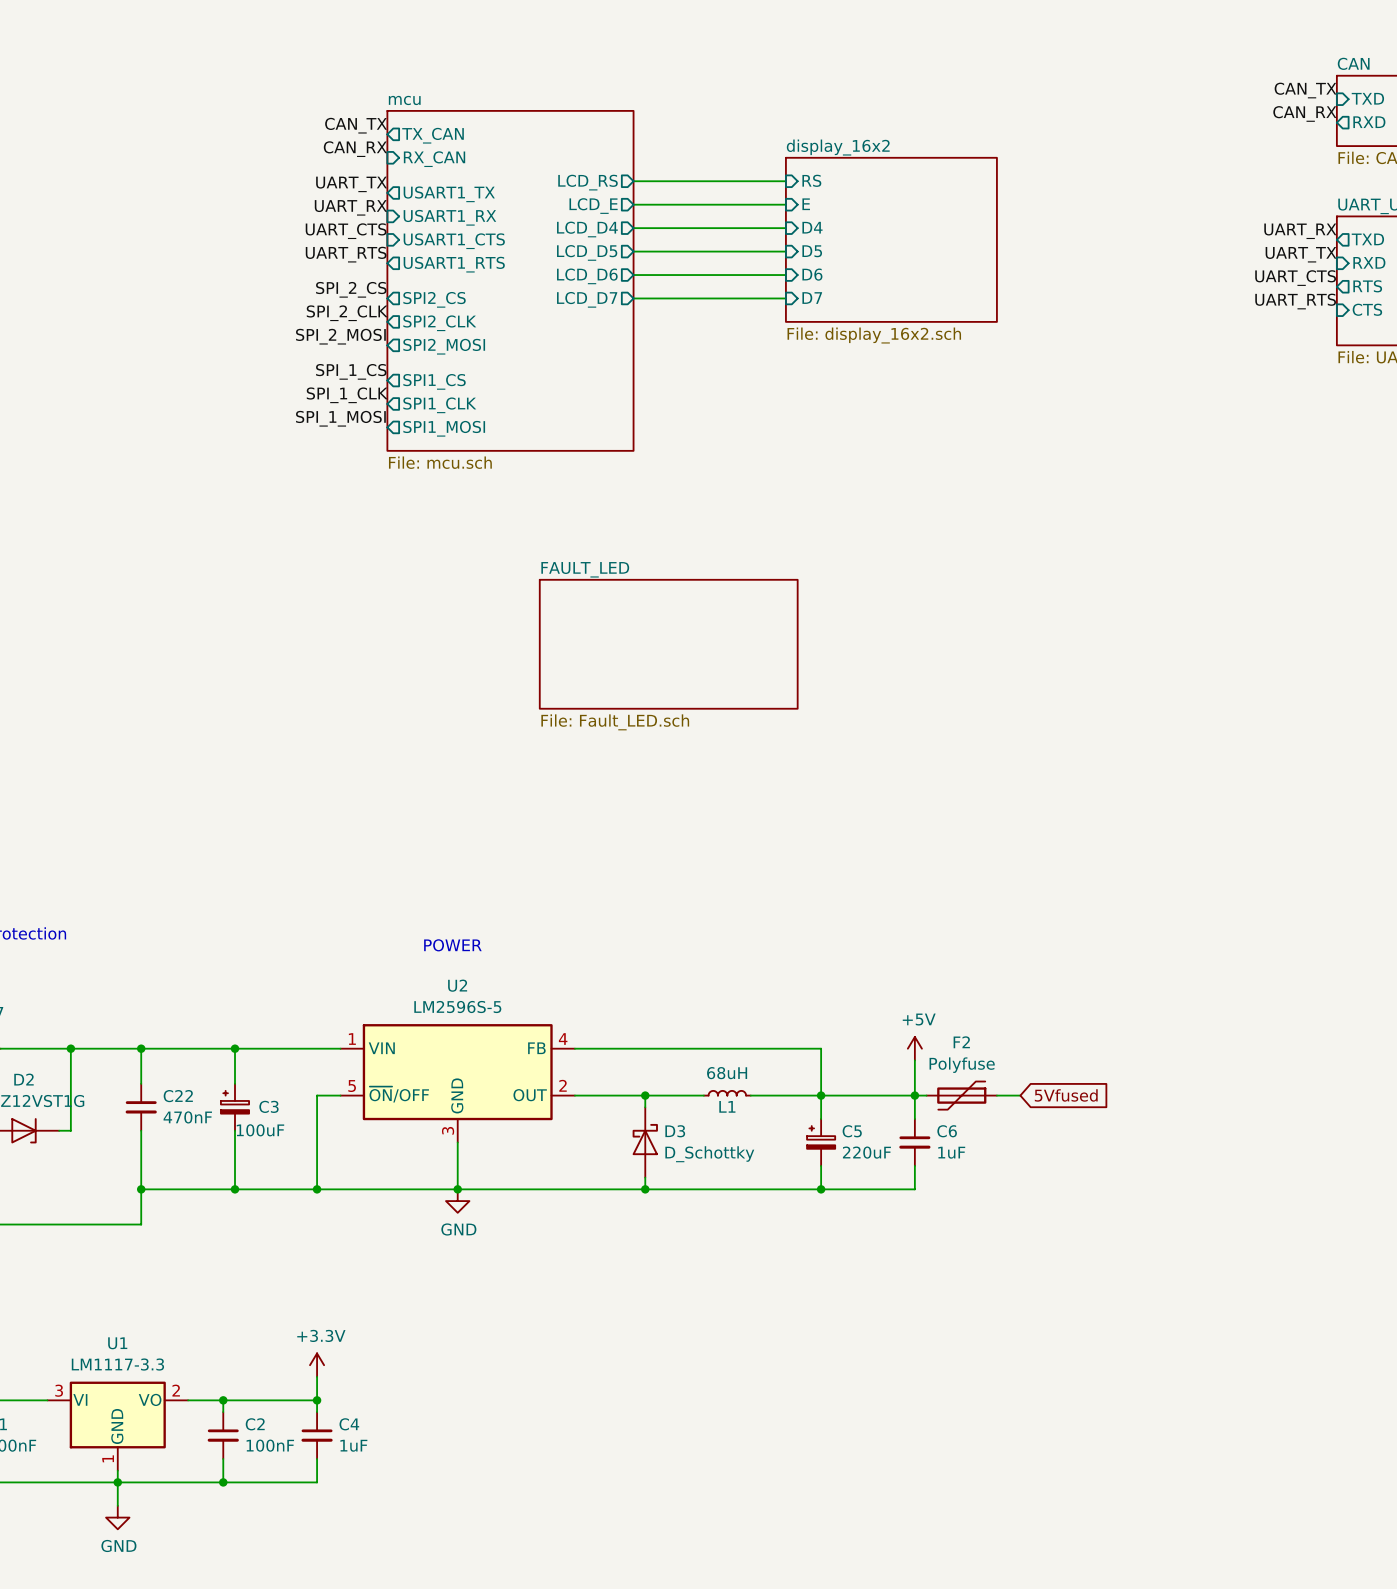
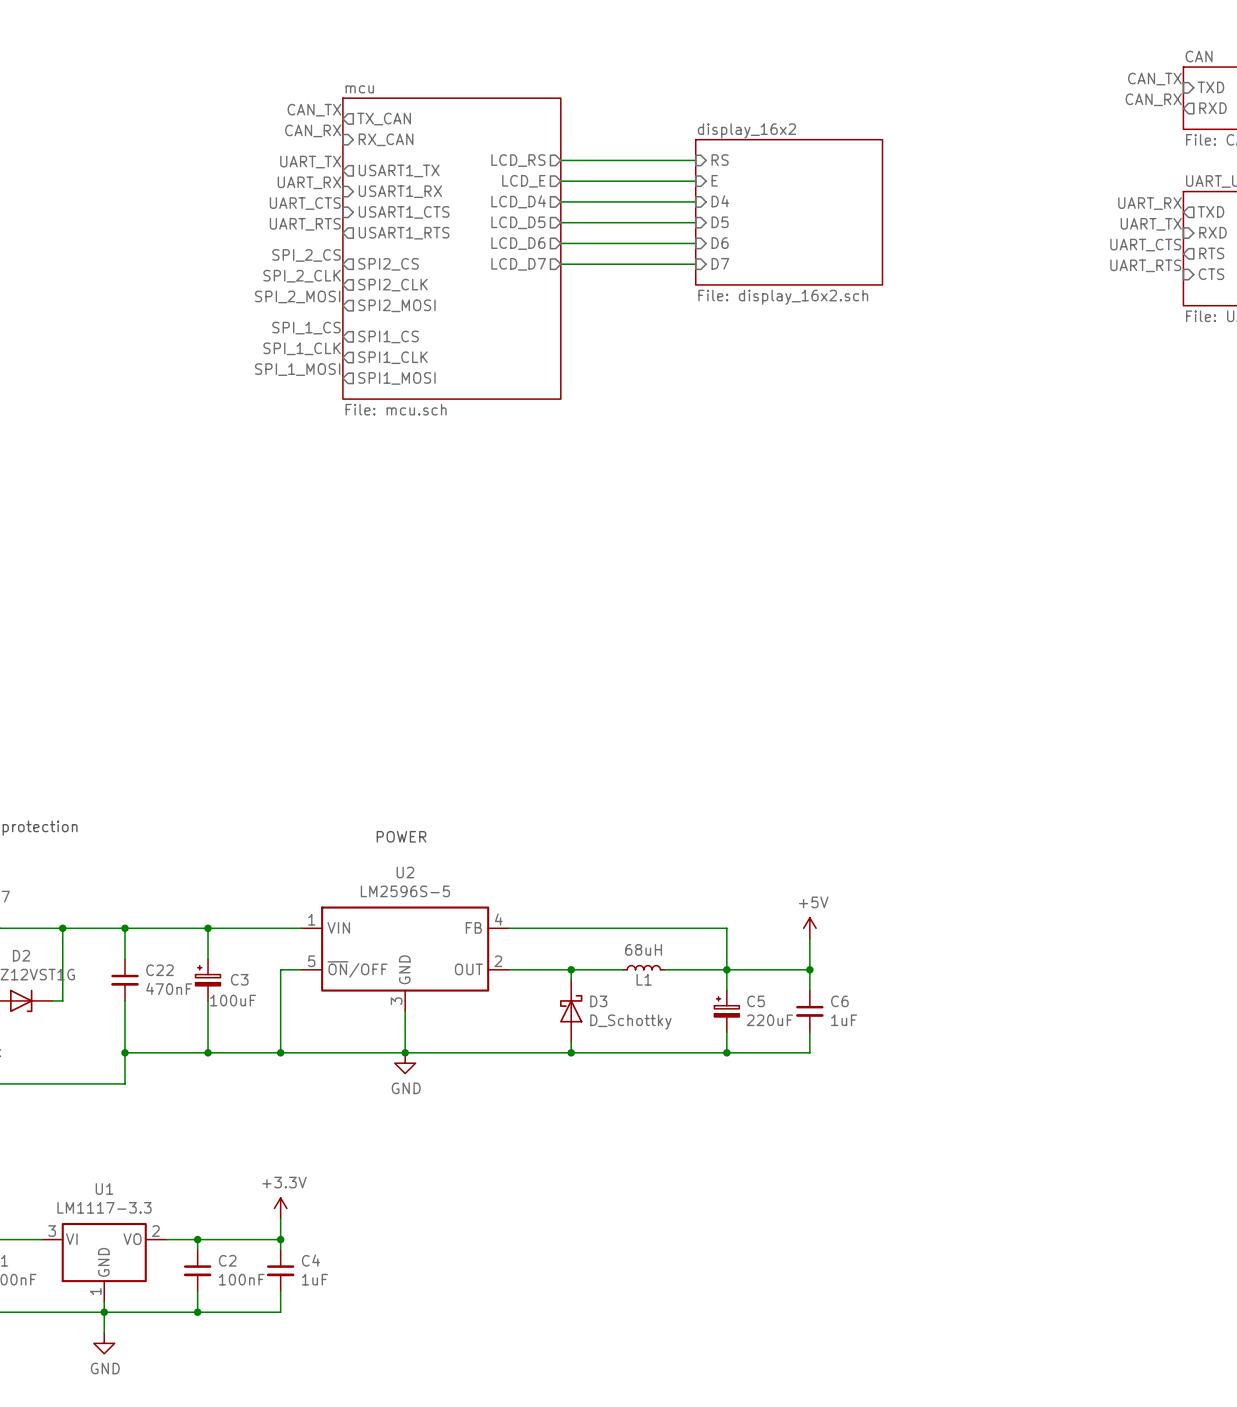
sheet FAULT_LED: File: Fault_LED.sch (668, 644) -> none
wire: (914, 1095) (926, 1095) -> none
F2: Polyfuse (961, 1095) -> none
wire: (996, 1095) (1020, 1095) -> none
global label: 5Vfused (1066, 1095) -> none

